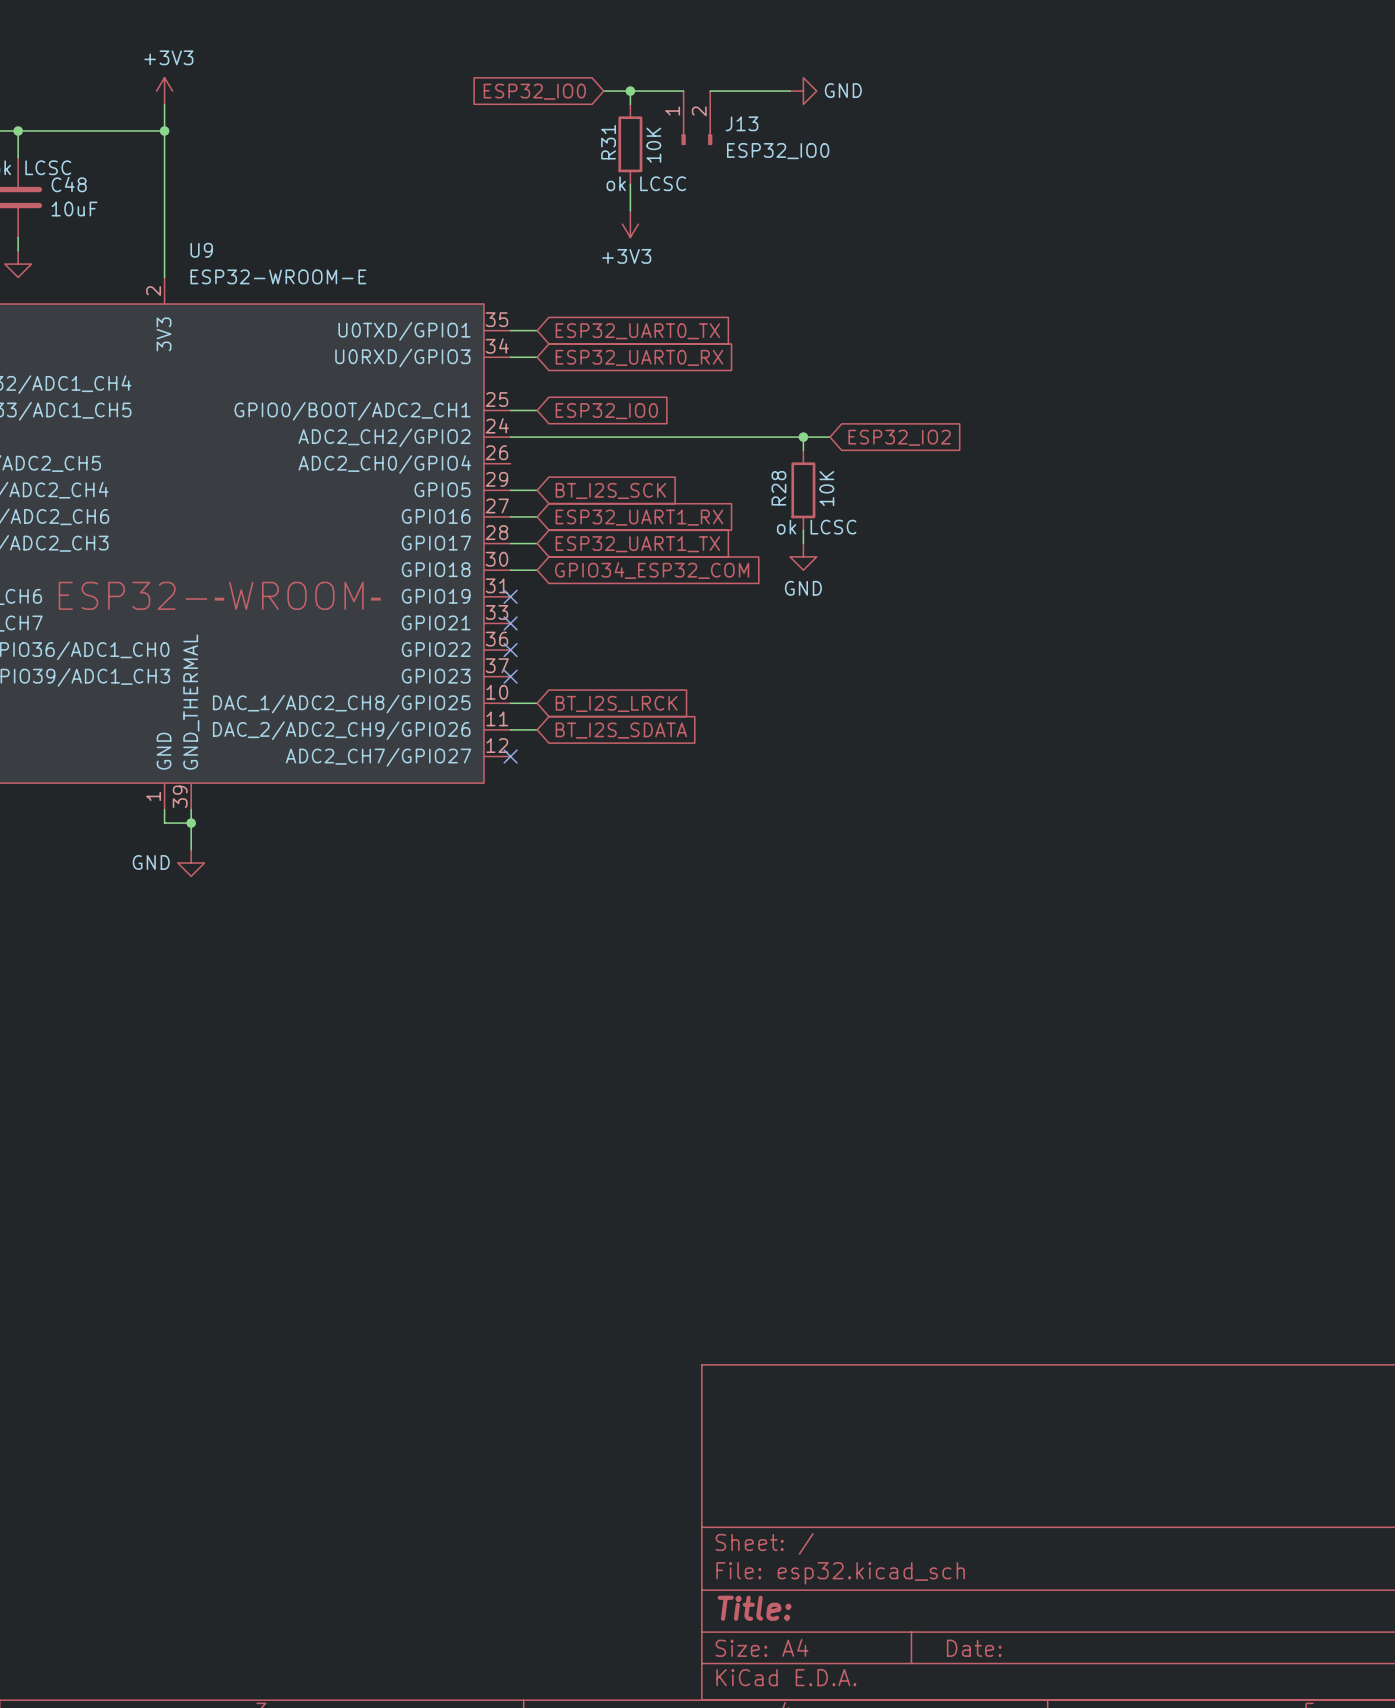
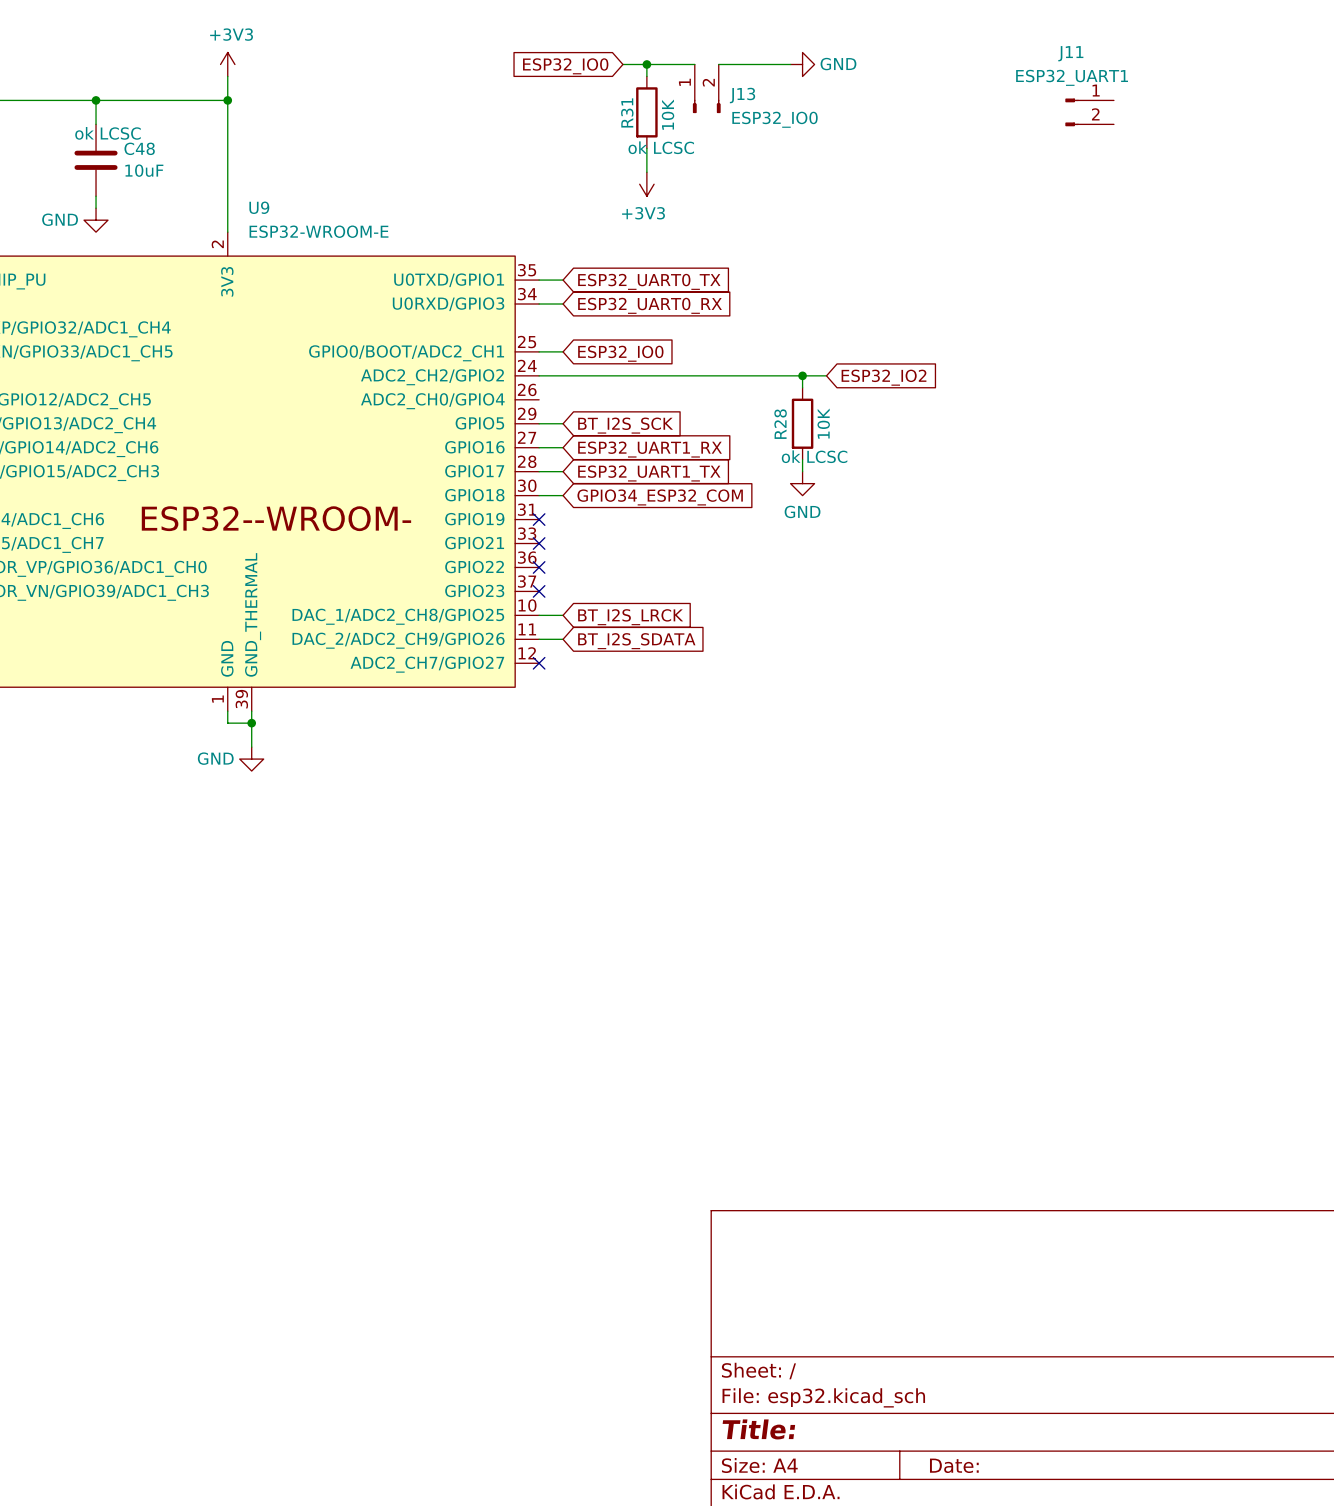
J11: none -> ESP32_UART1 (1089, 112)

